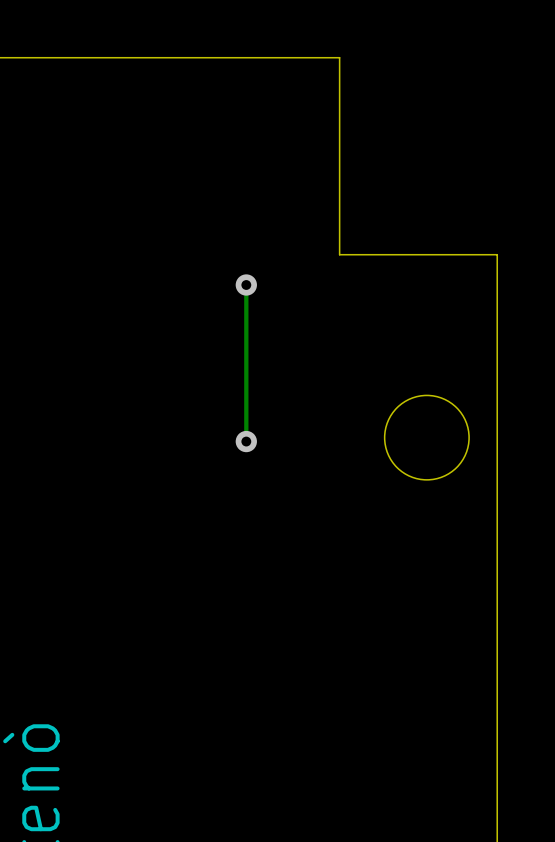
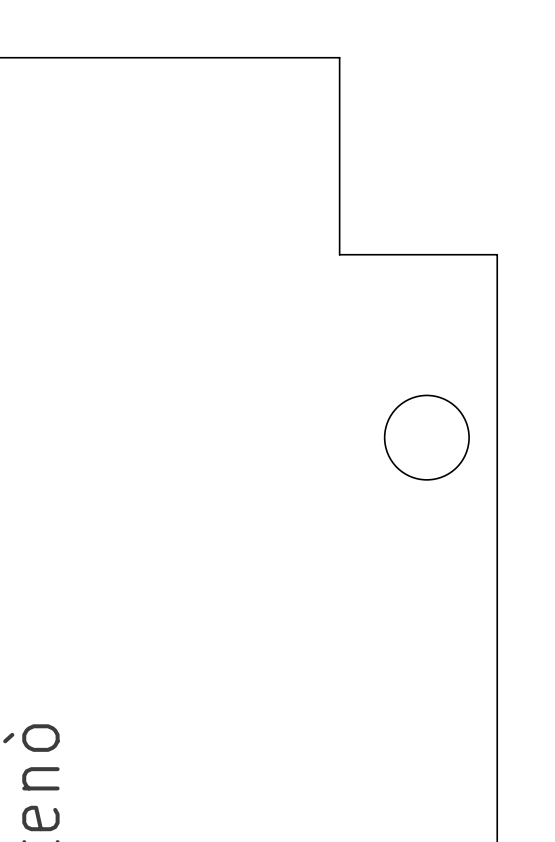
track: (246, 285) (246, 441) -> none
via: (246, 285) -> none
via: (246, 441) -> none

